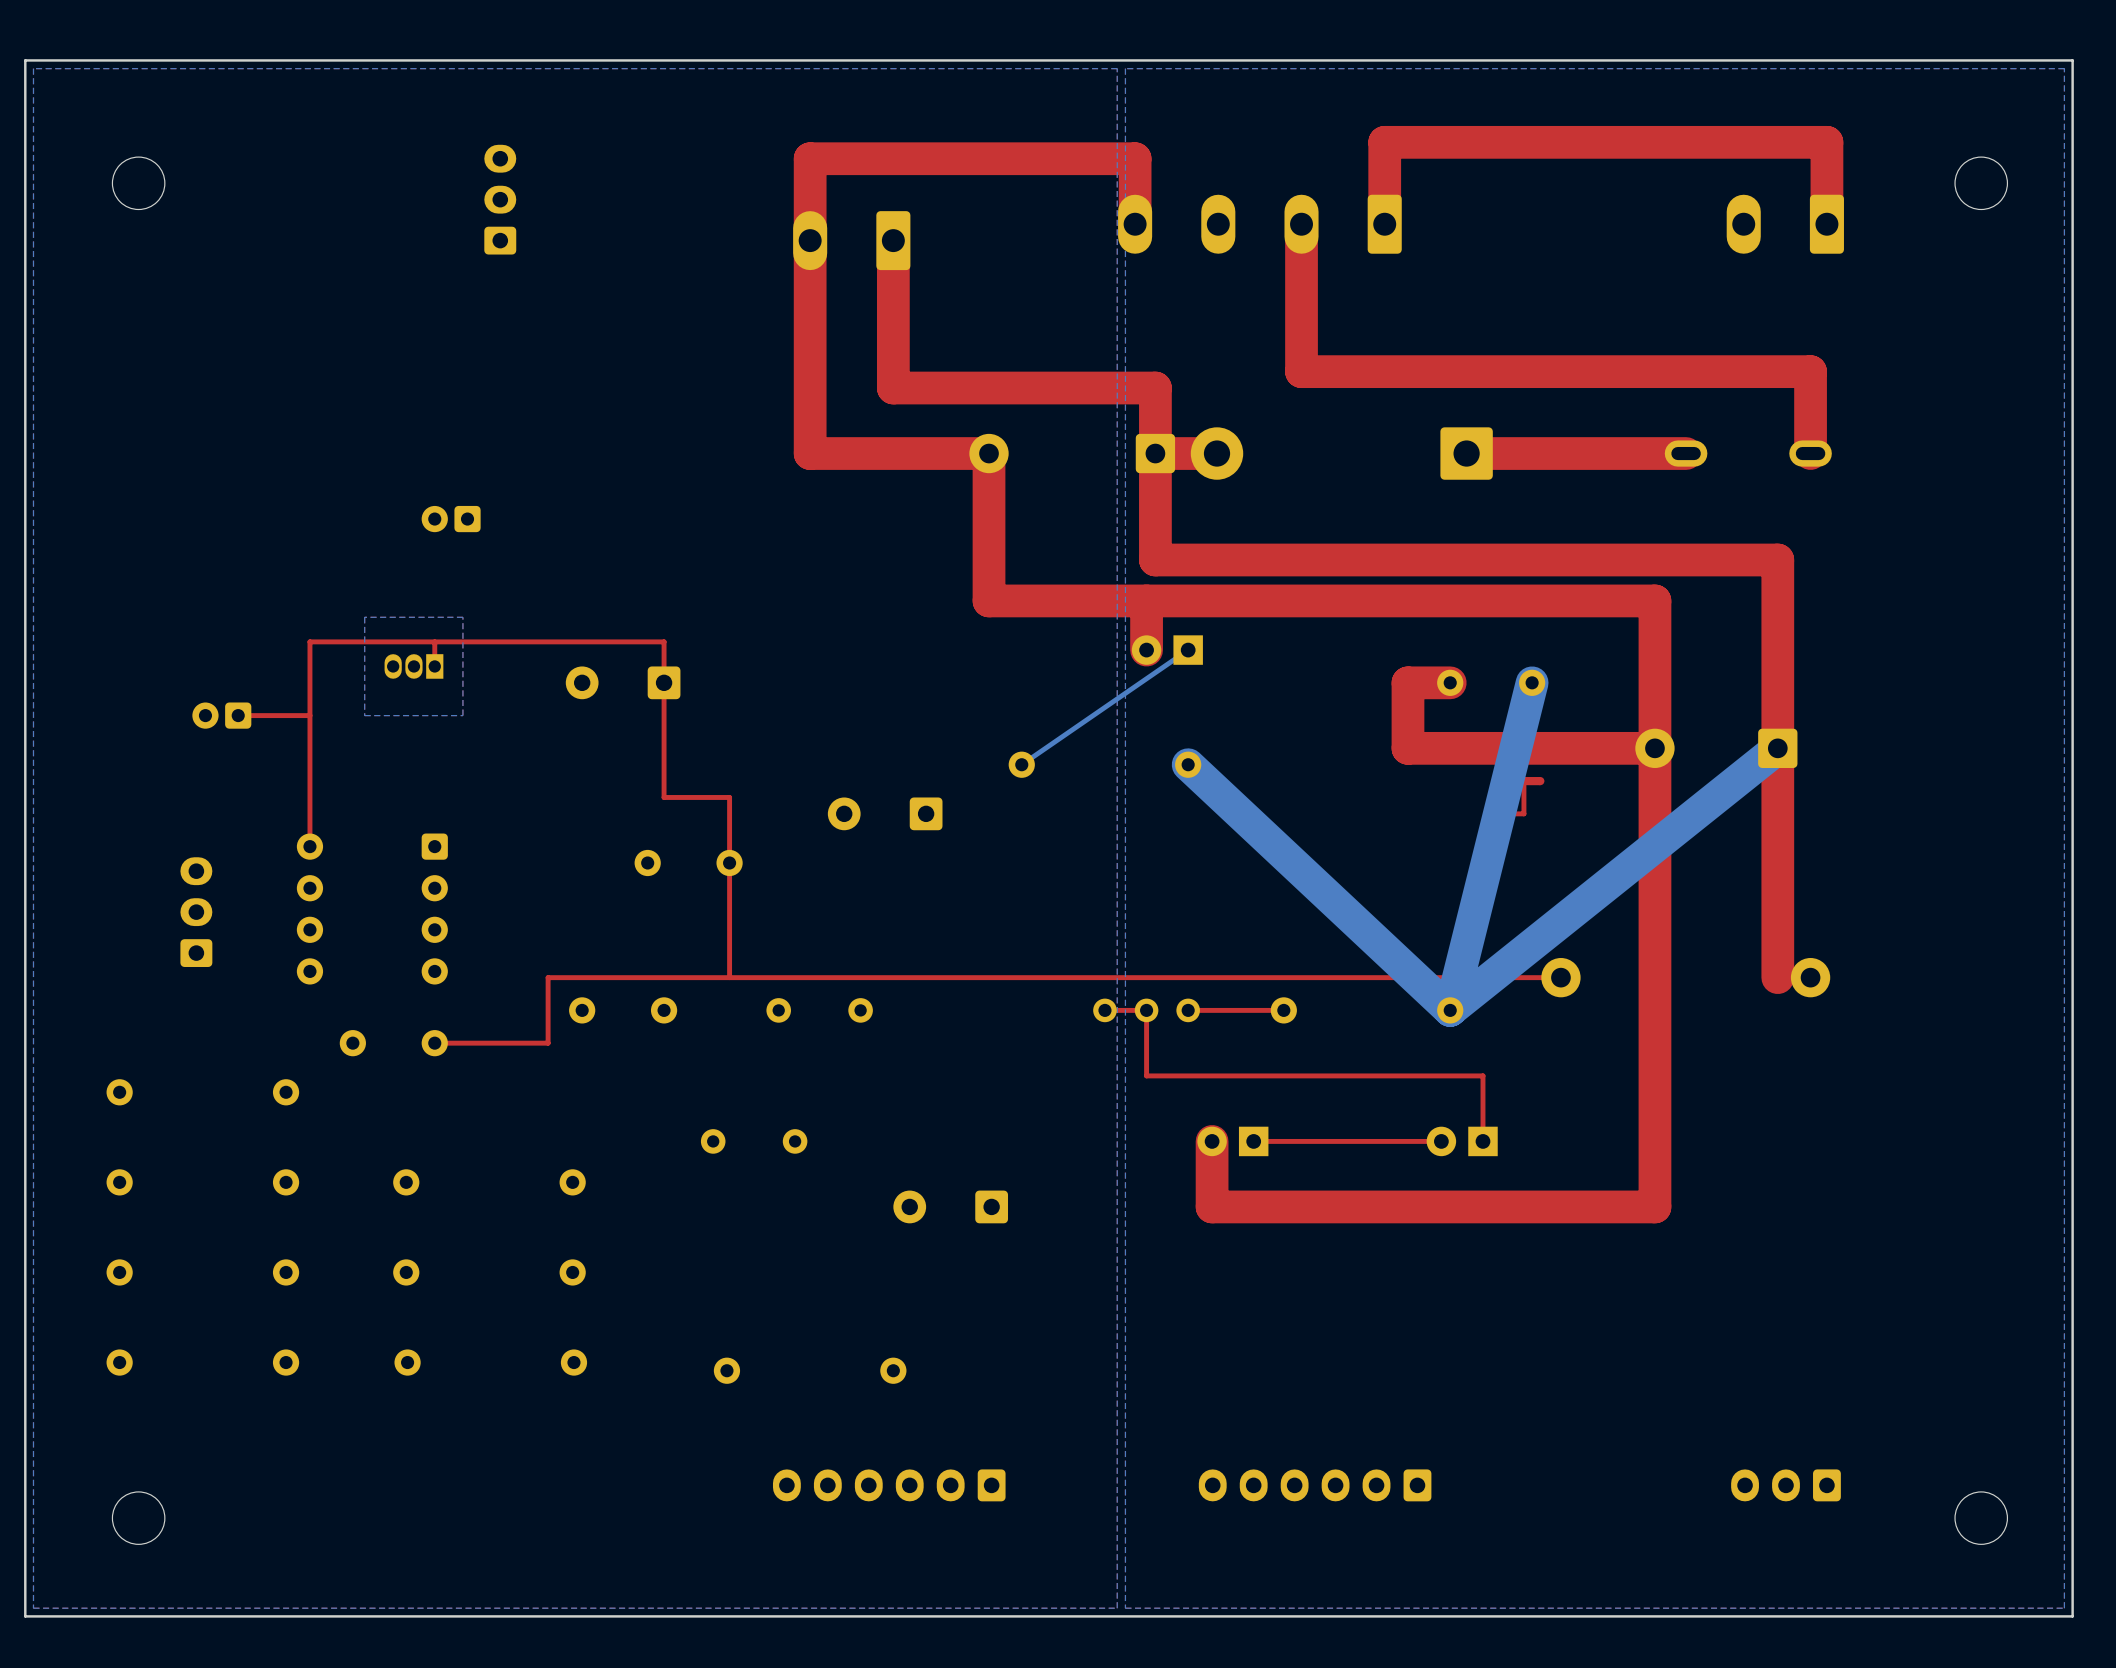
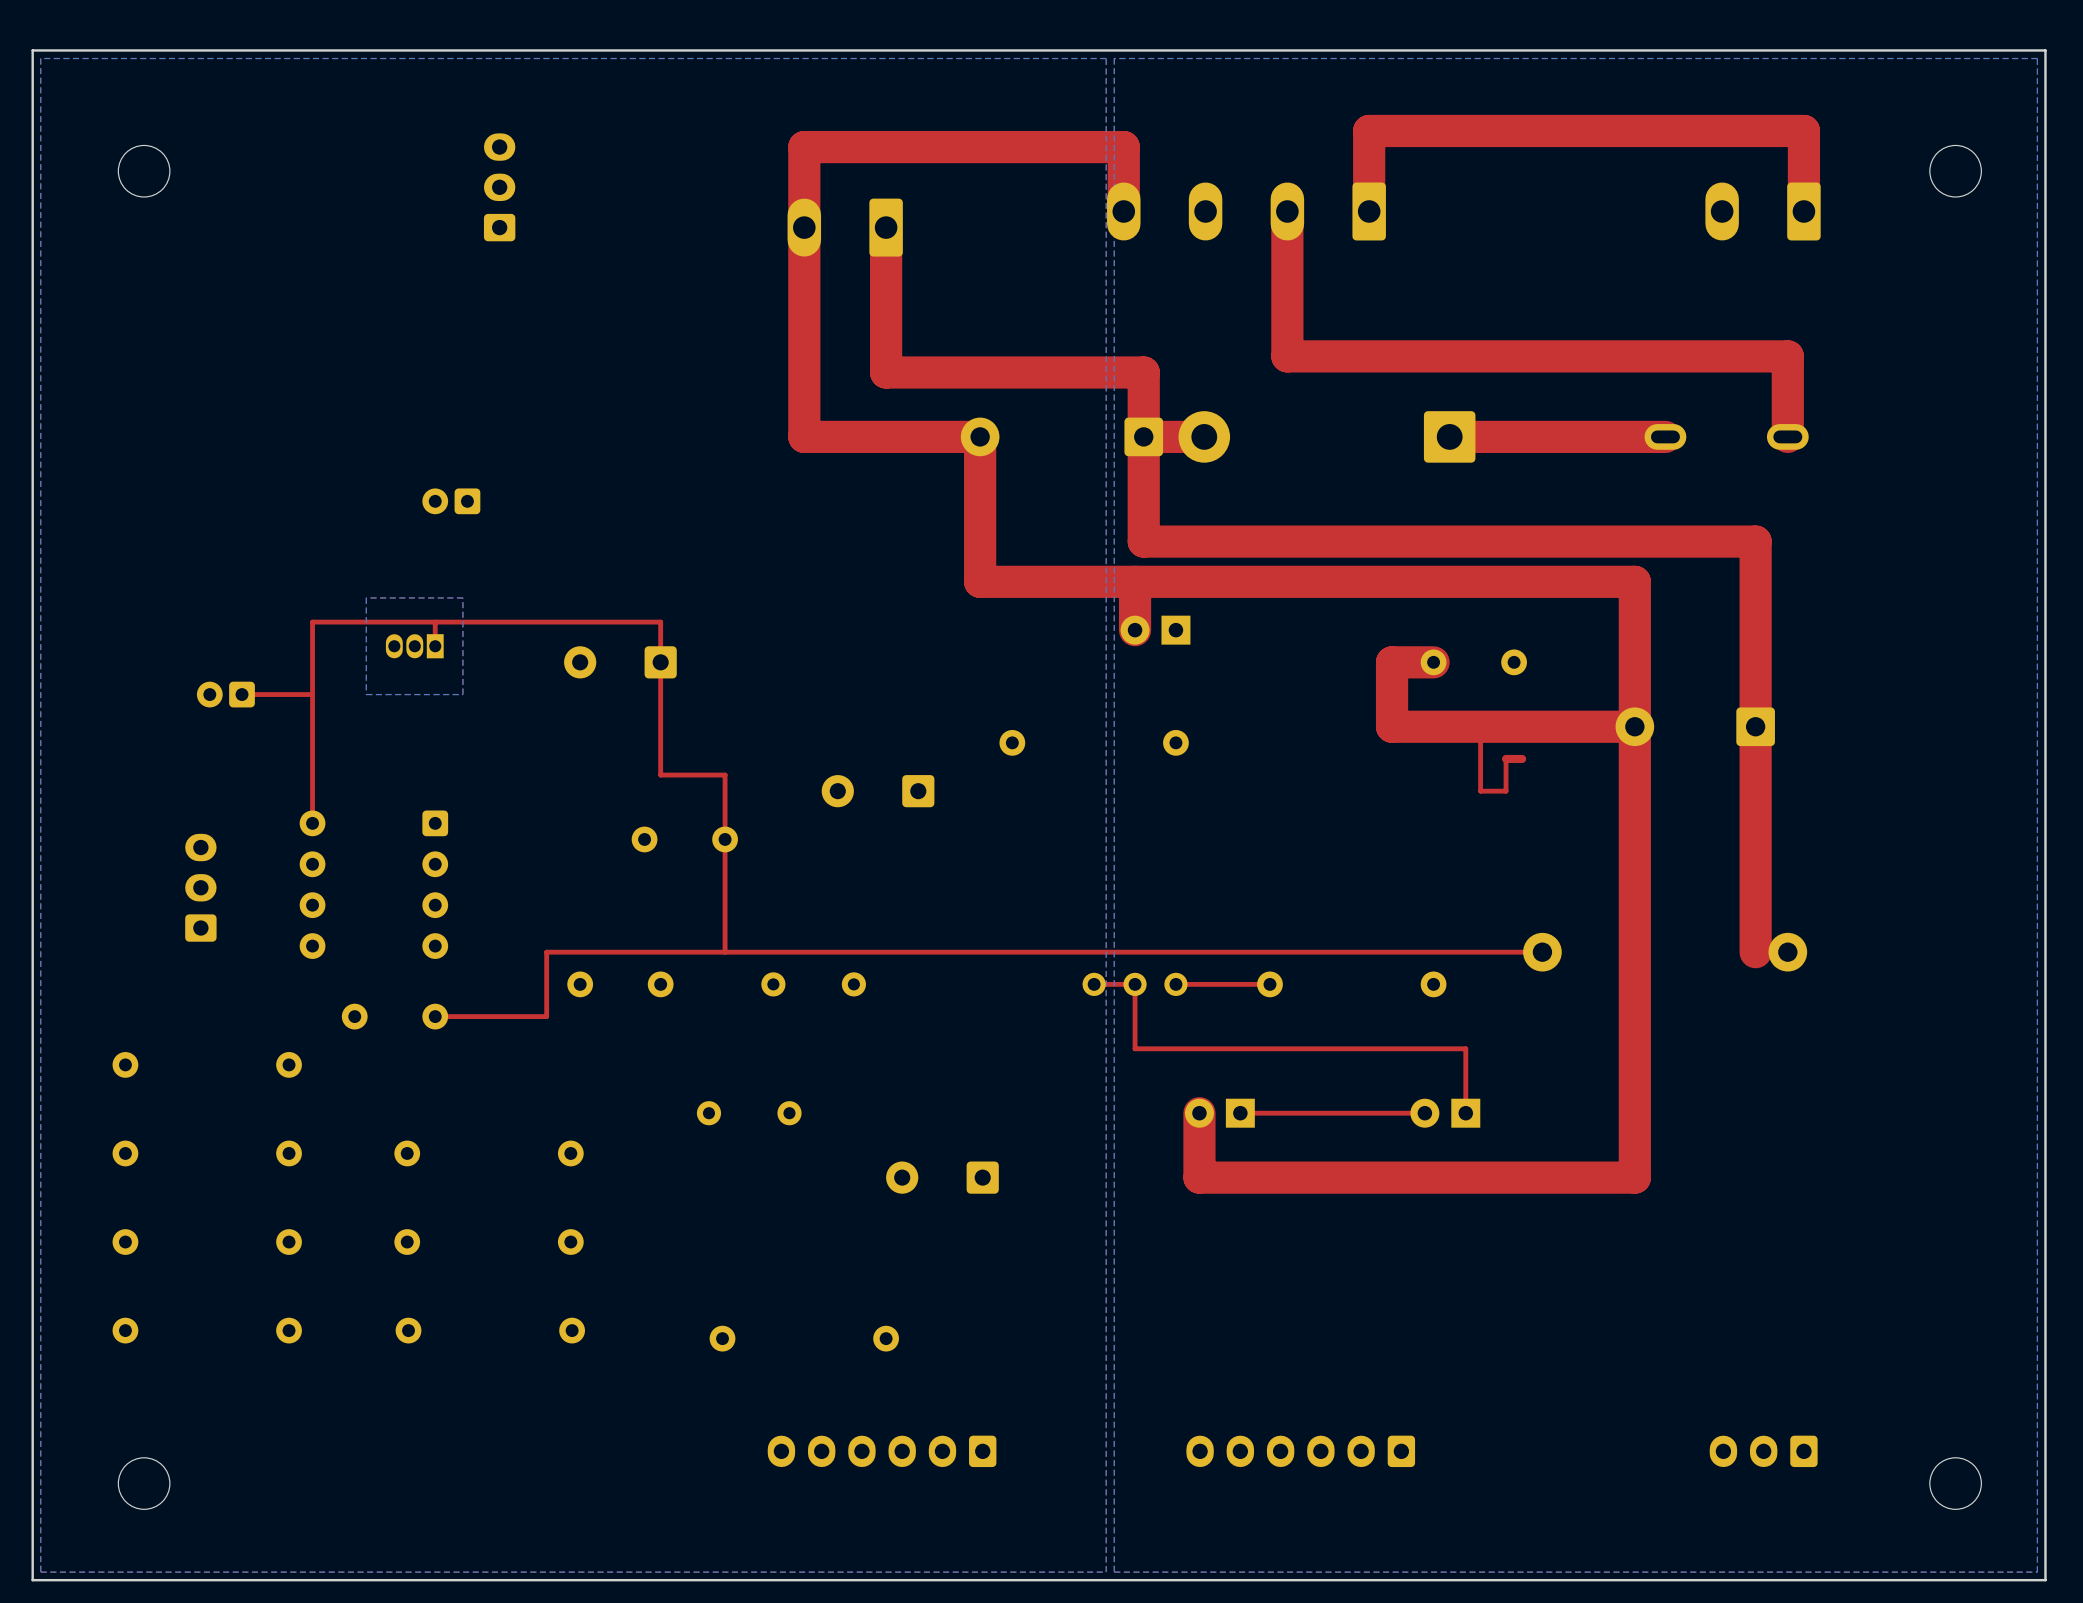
bottom track: (1188, 650) (1021, 764) -> none
bottom track: (1532, 682) (1450, 1010) -> none
bottom track: (1777, 748) (1450, 1010) -> none
bottom track: (1188, 764) (1450, 1010) -> none

